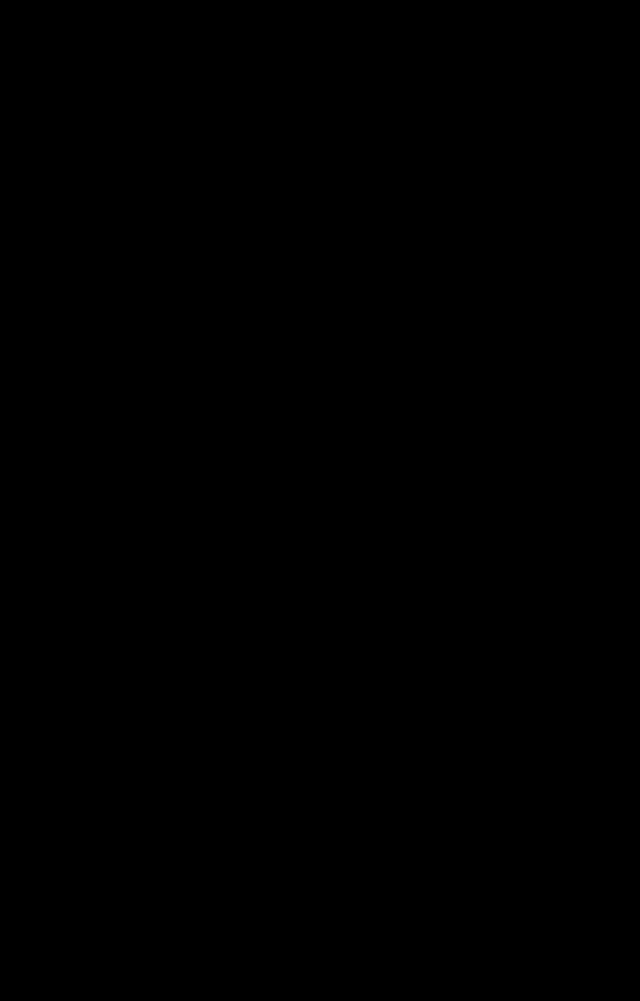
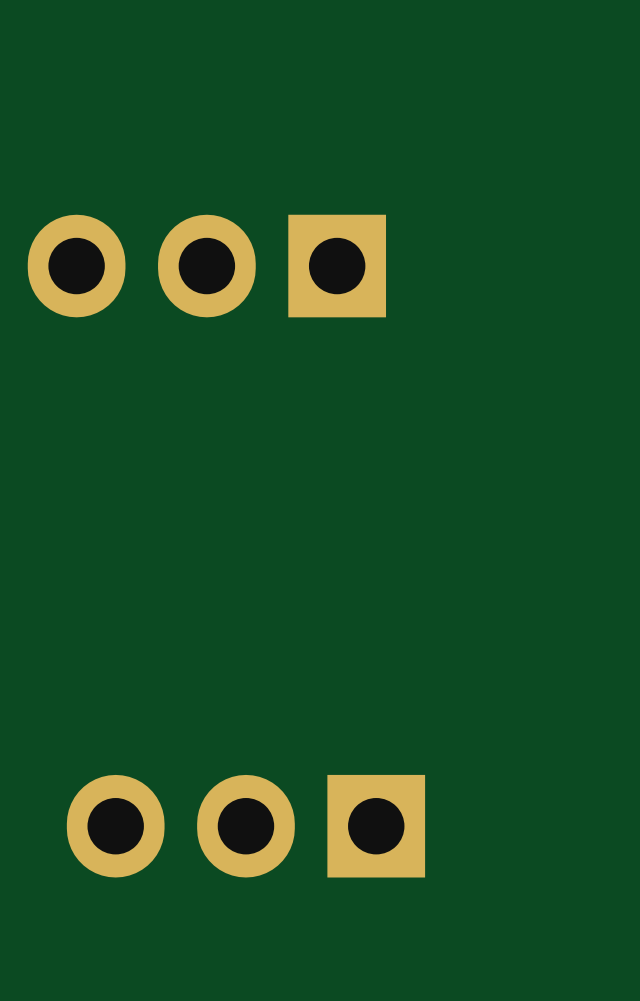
part: none -> (206, 266)
part: none -> (245, 826)

